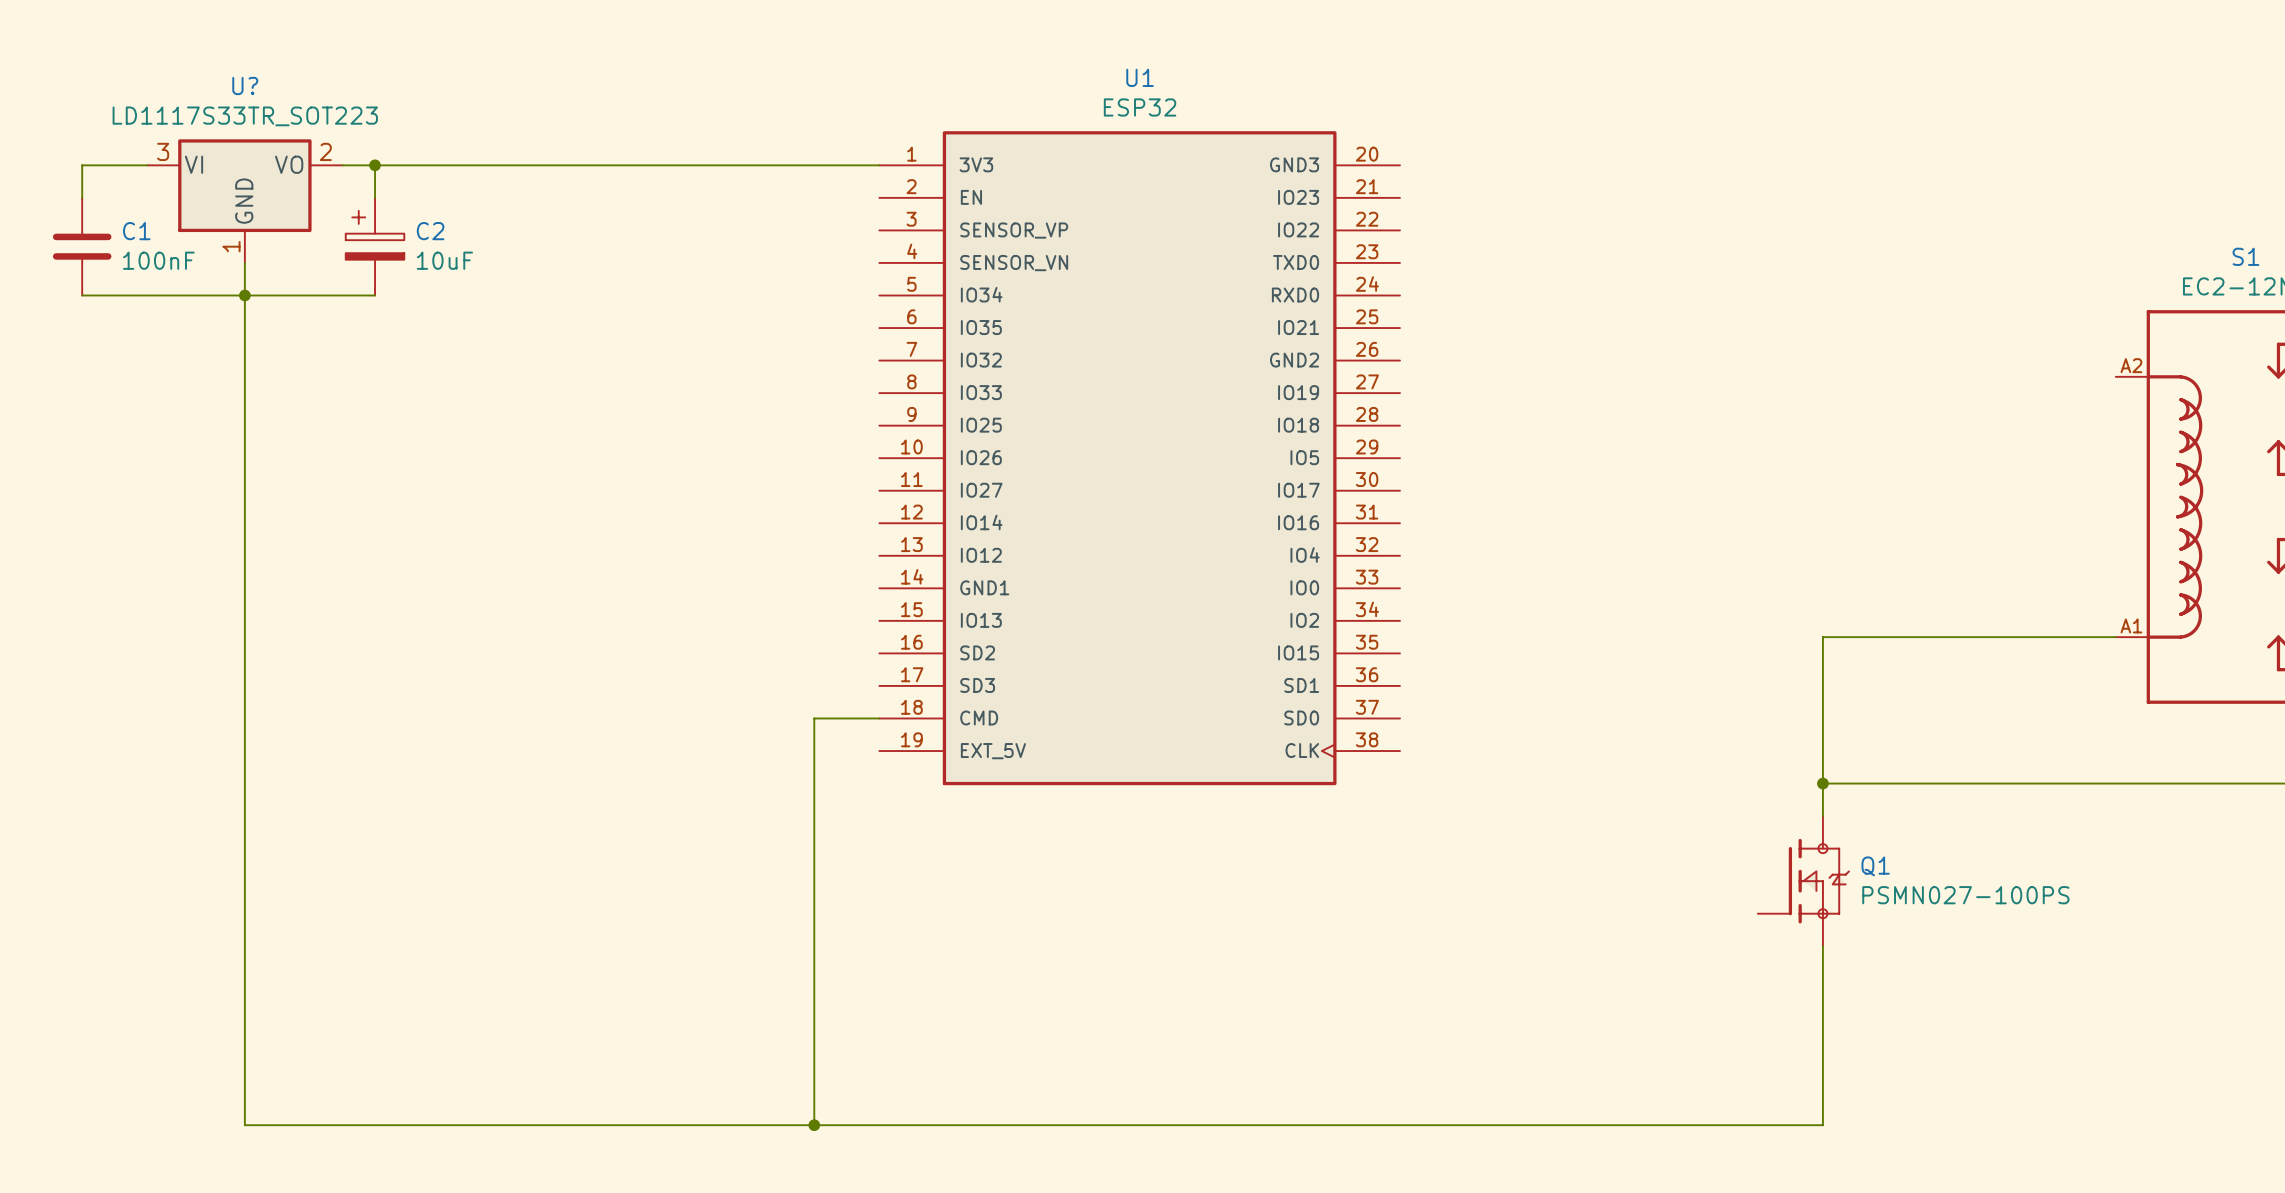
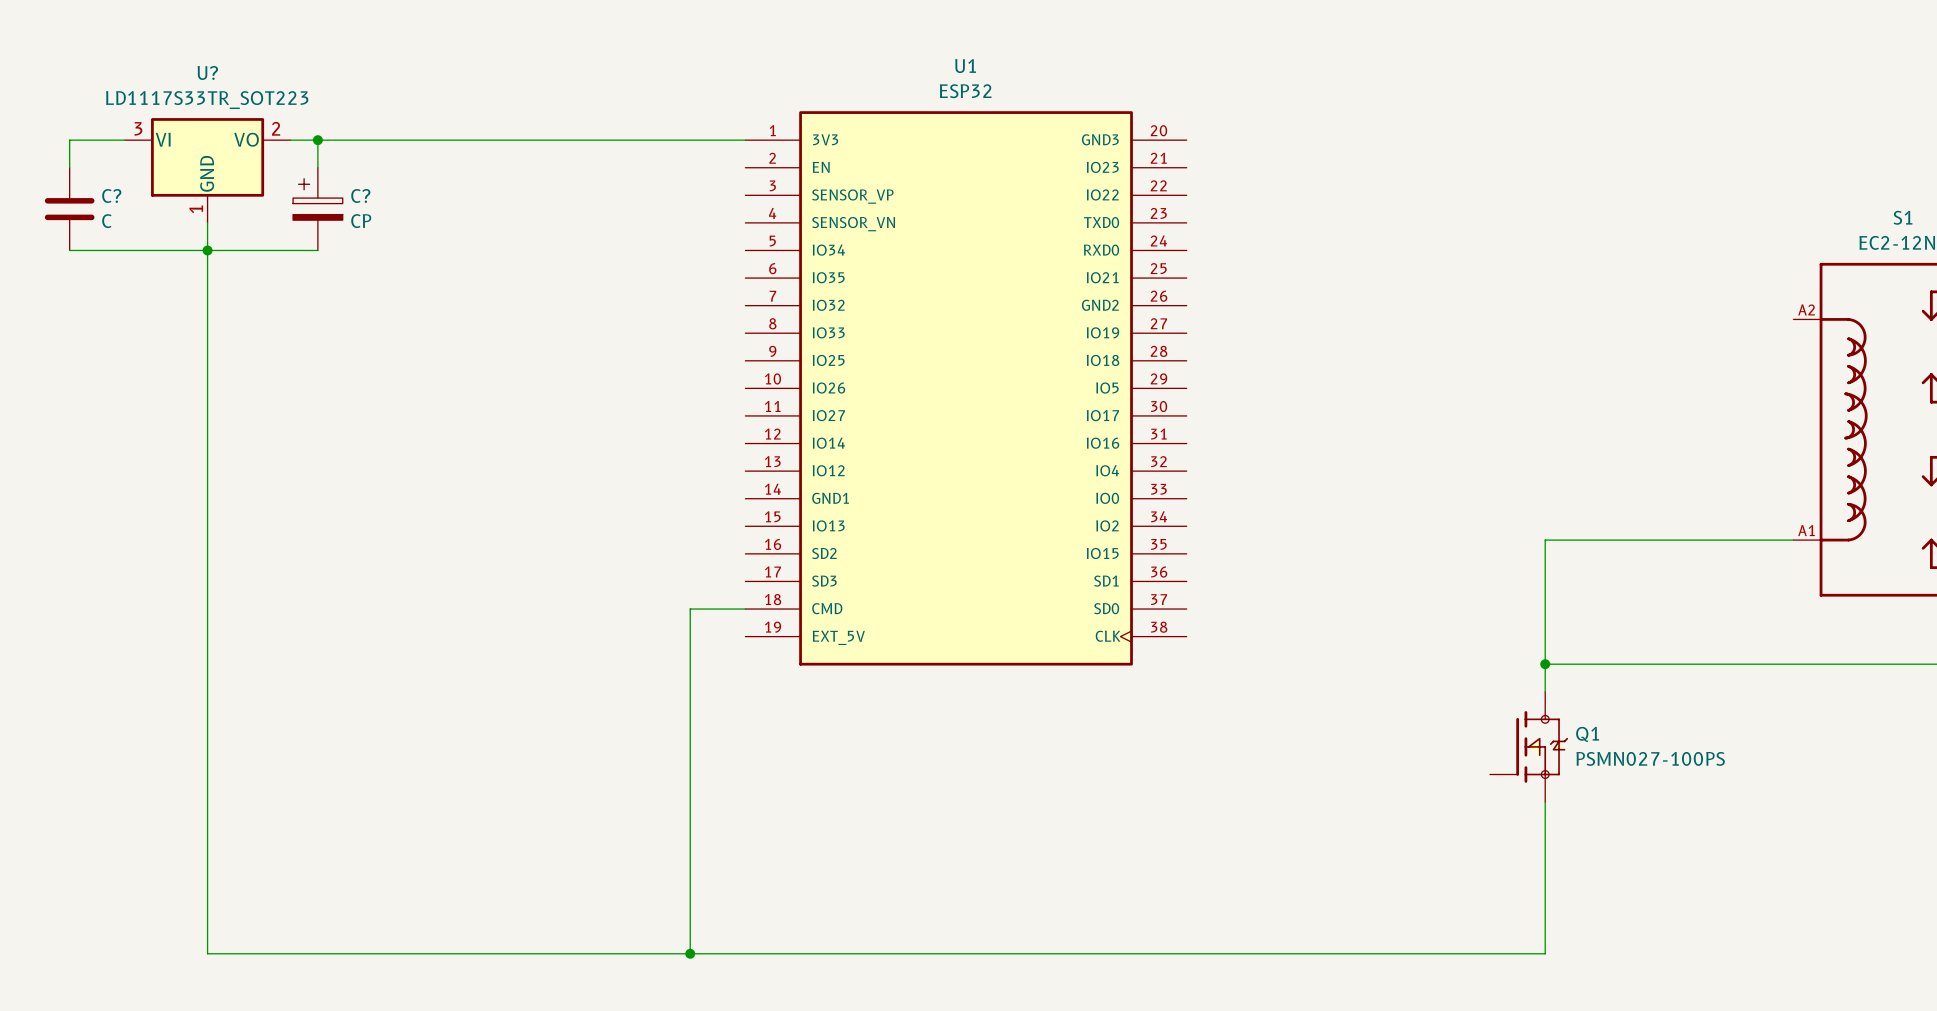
C1 name: C1 (136, 231) -> C? (111, 195)
C2 name: C2 (430, 231) -> C? (360, 195)
C1 value: 100nF (158, 260) -> C (106, 221)
C2 value: 10uF (444, 260) -> CP (361, 221)

